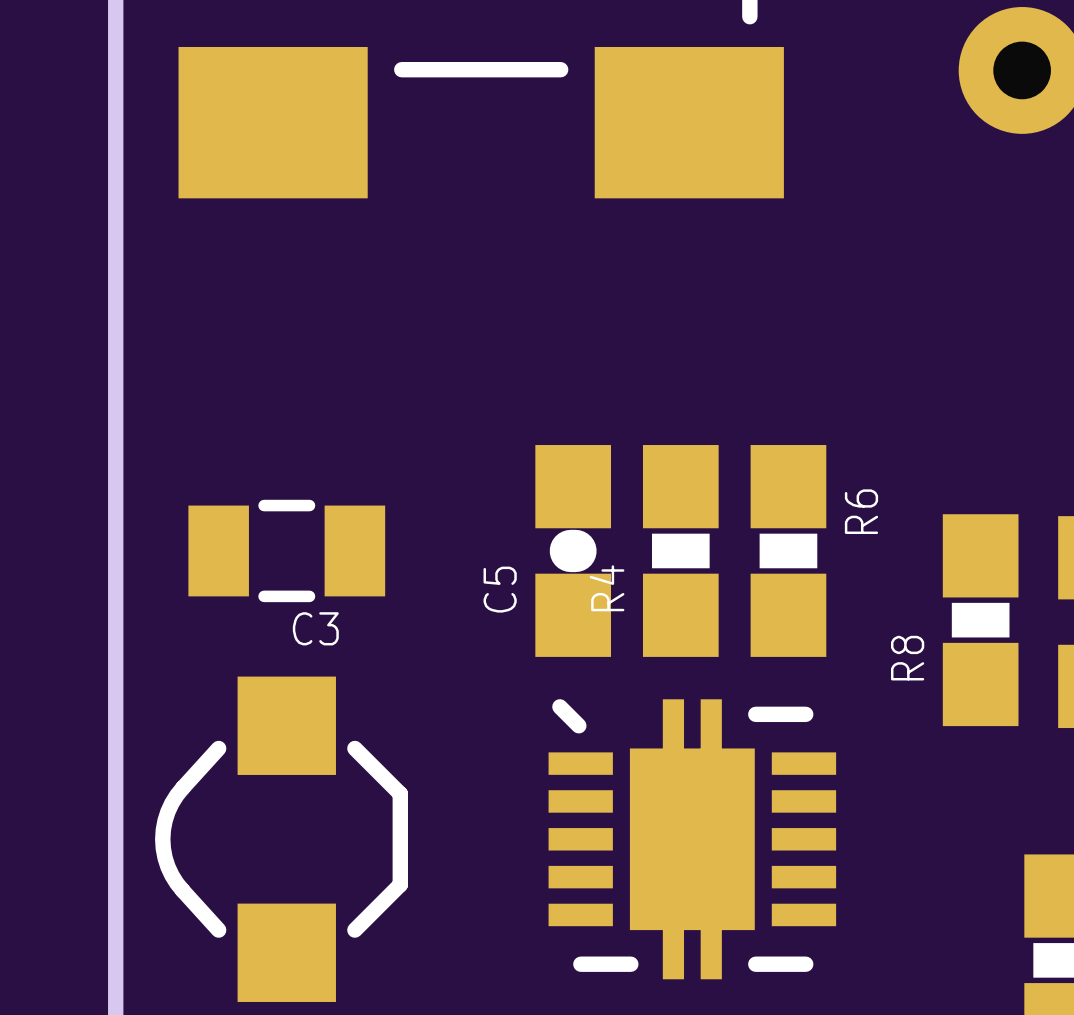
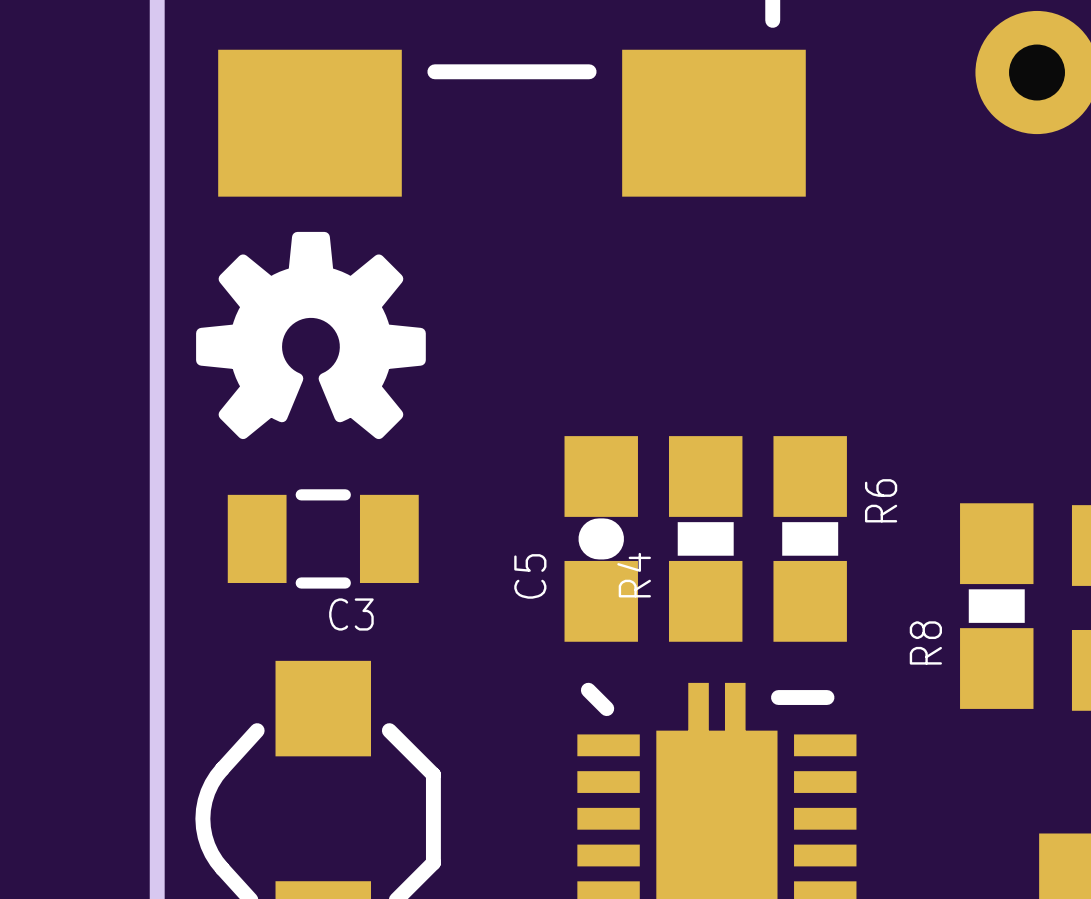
drawing: none -> [196, 231, 426, 440]

